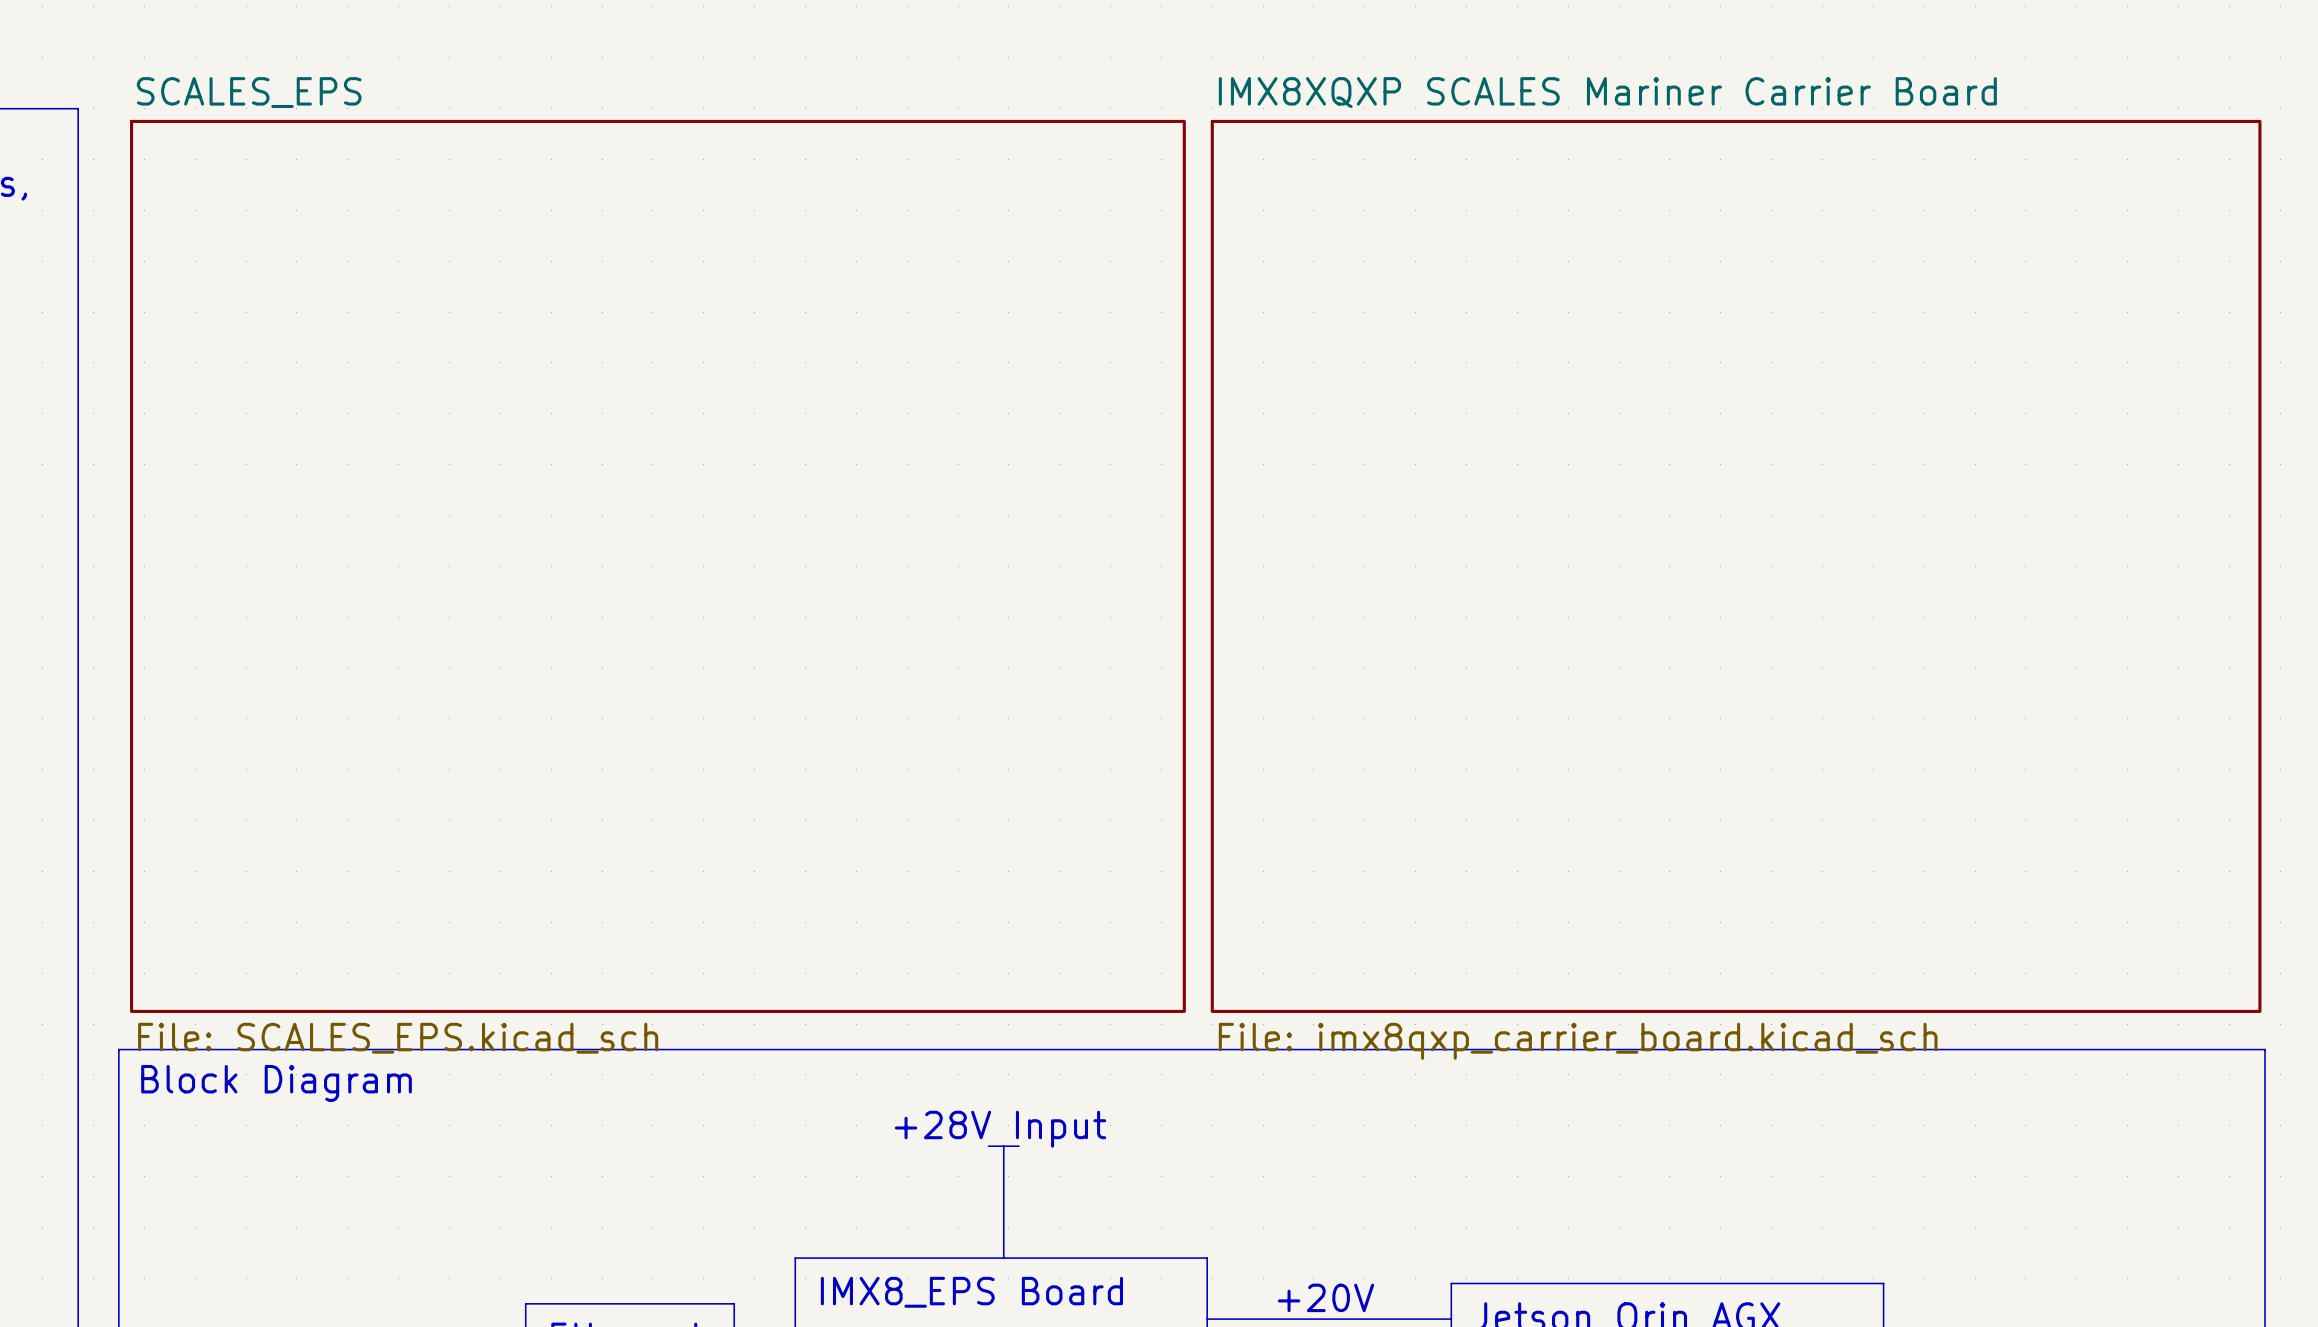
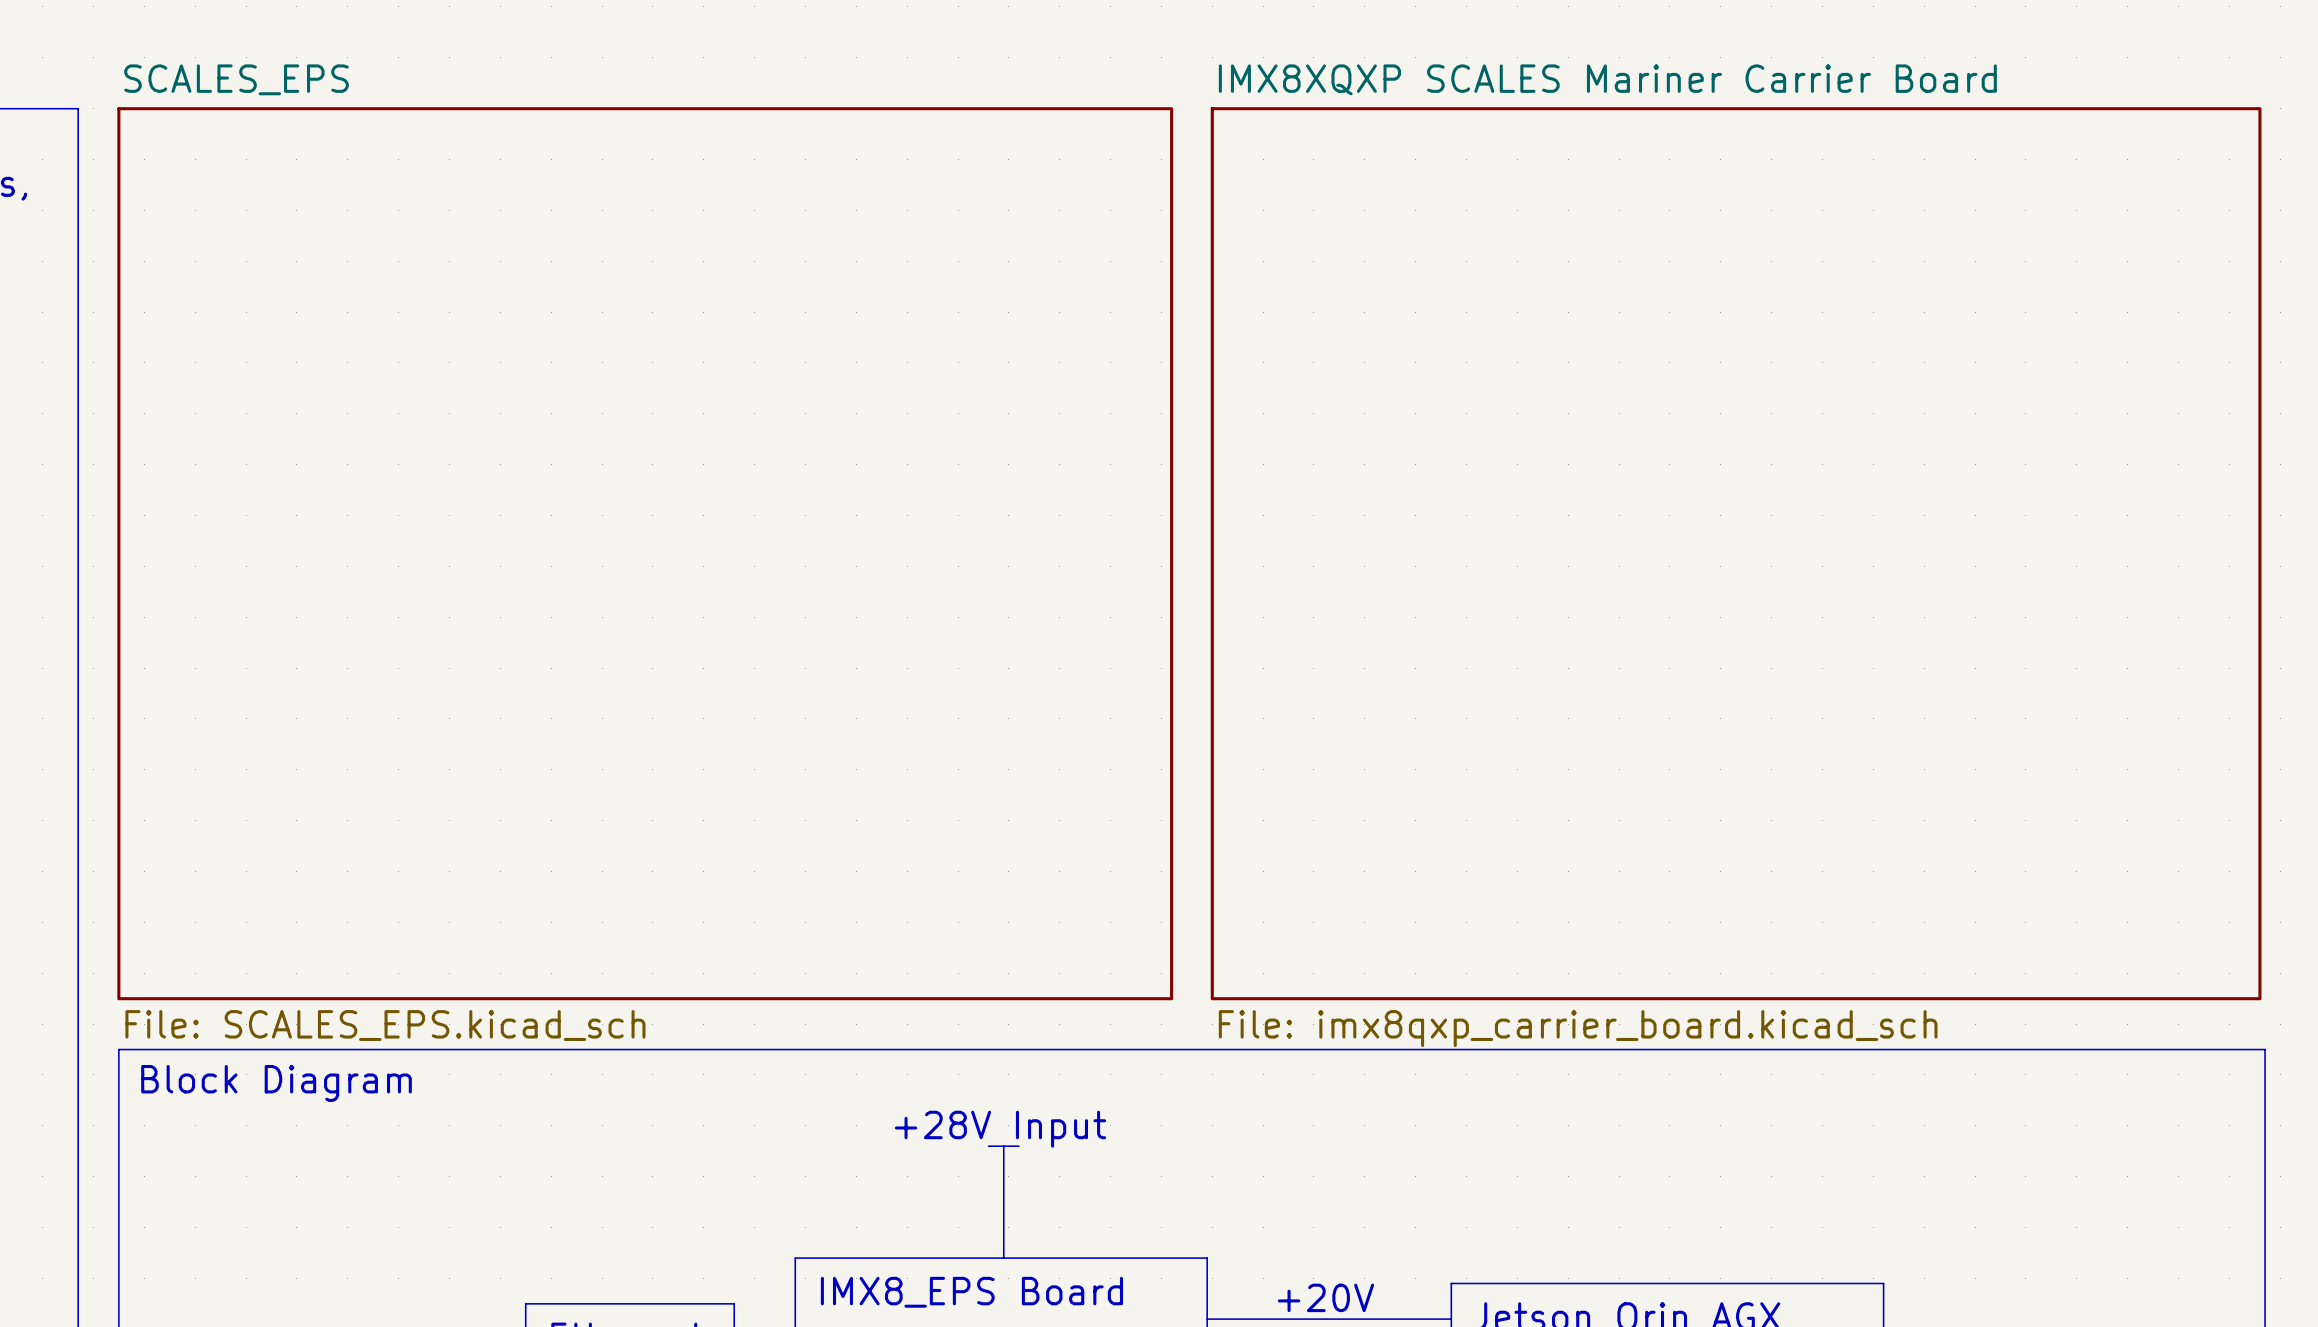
sheet SCALES_EPS position: (657, 566) -> (645, 553)
sheet IMX8XQXP SCALES Mariner Carrier Board position: (1736, 566) -> (1736, 553)

